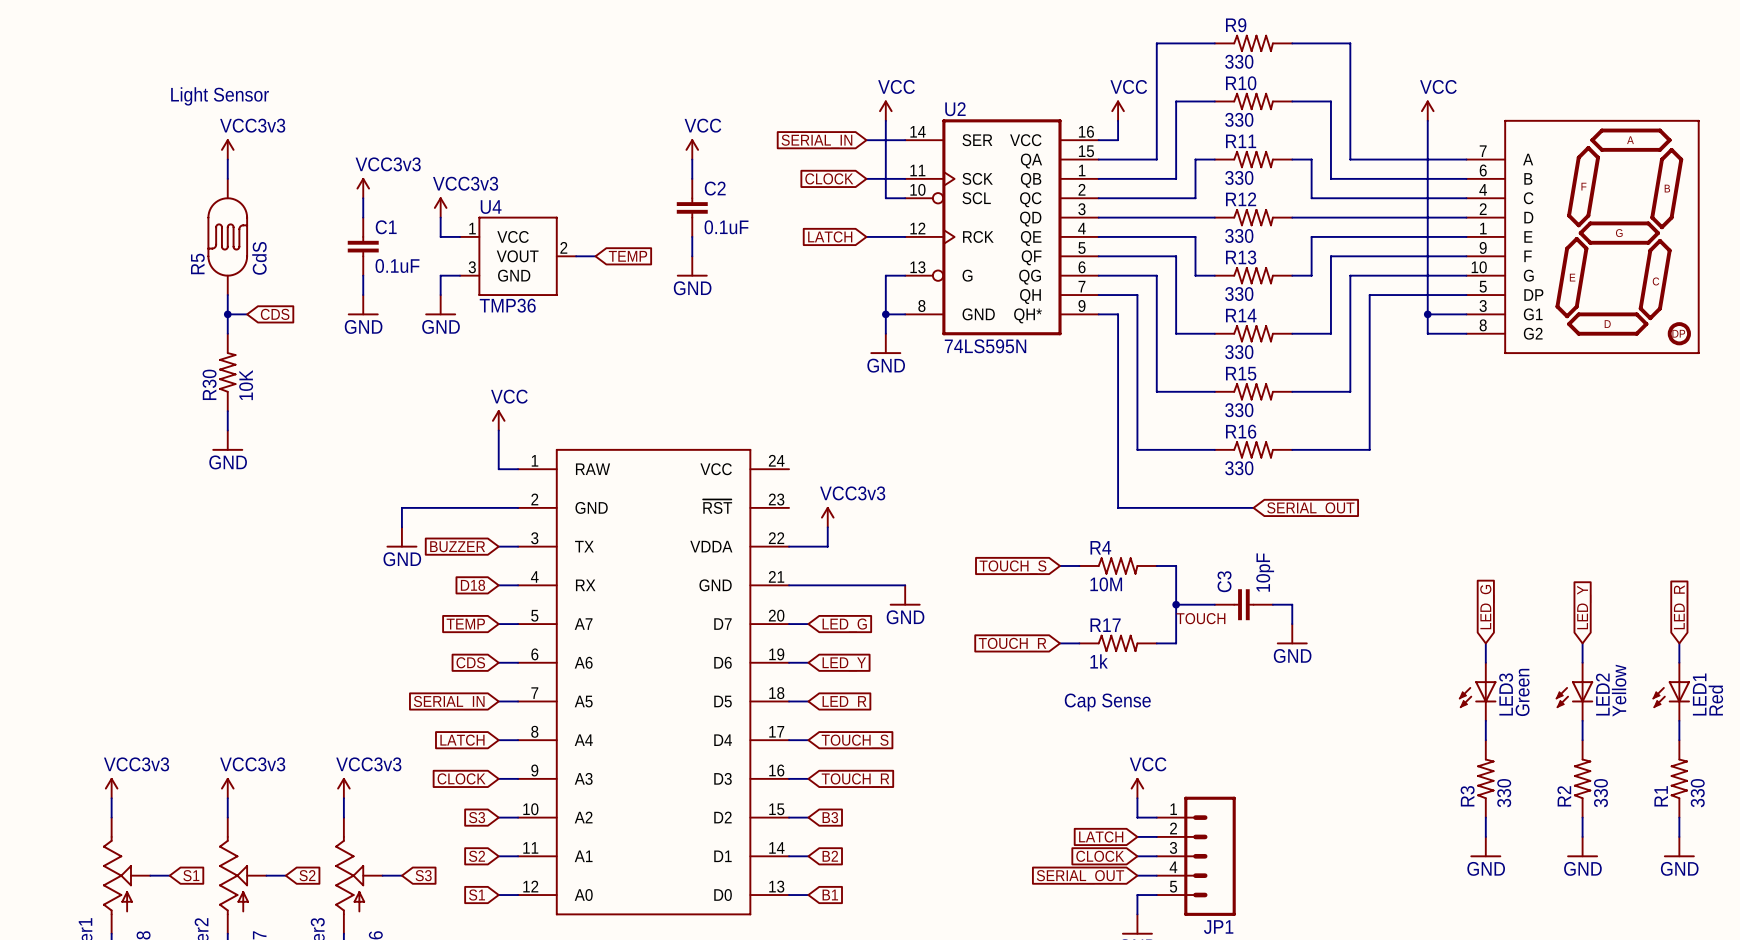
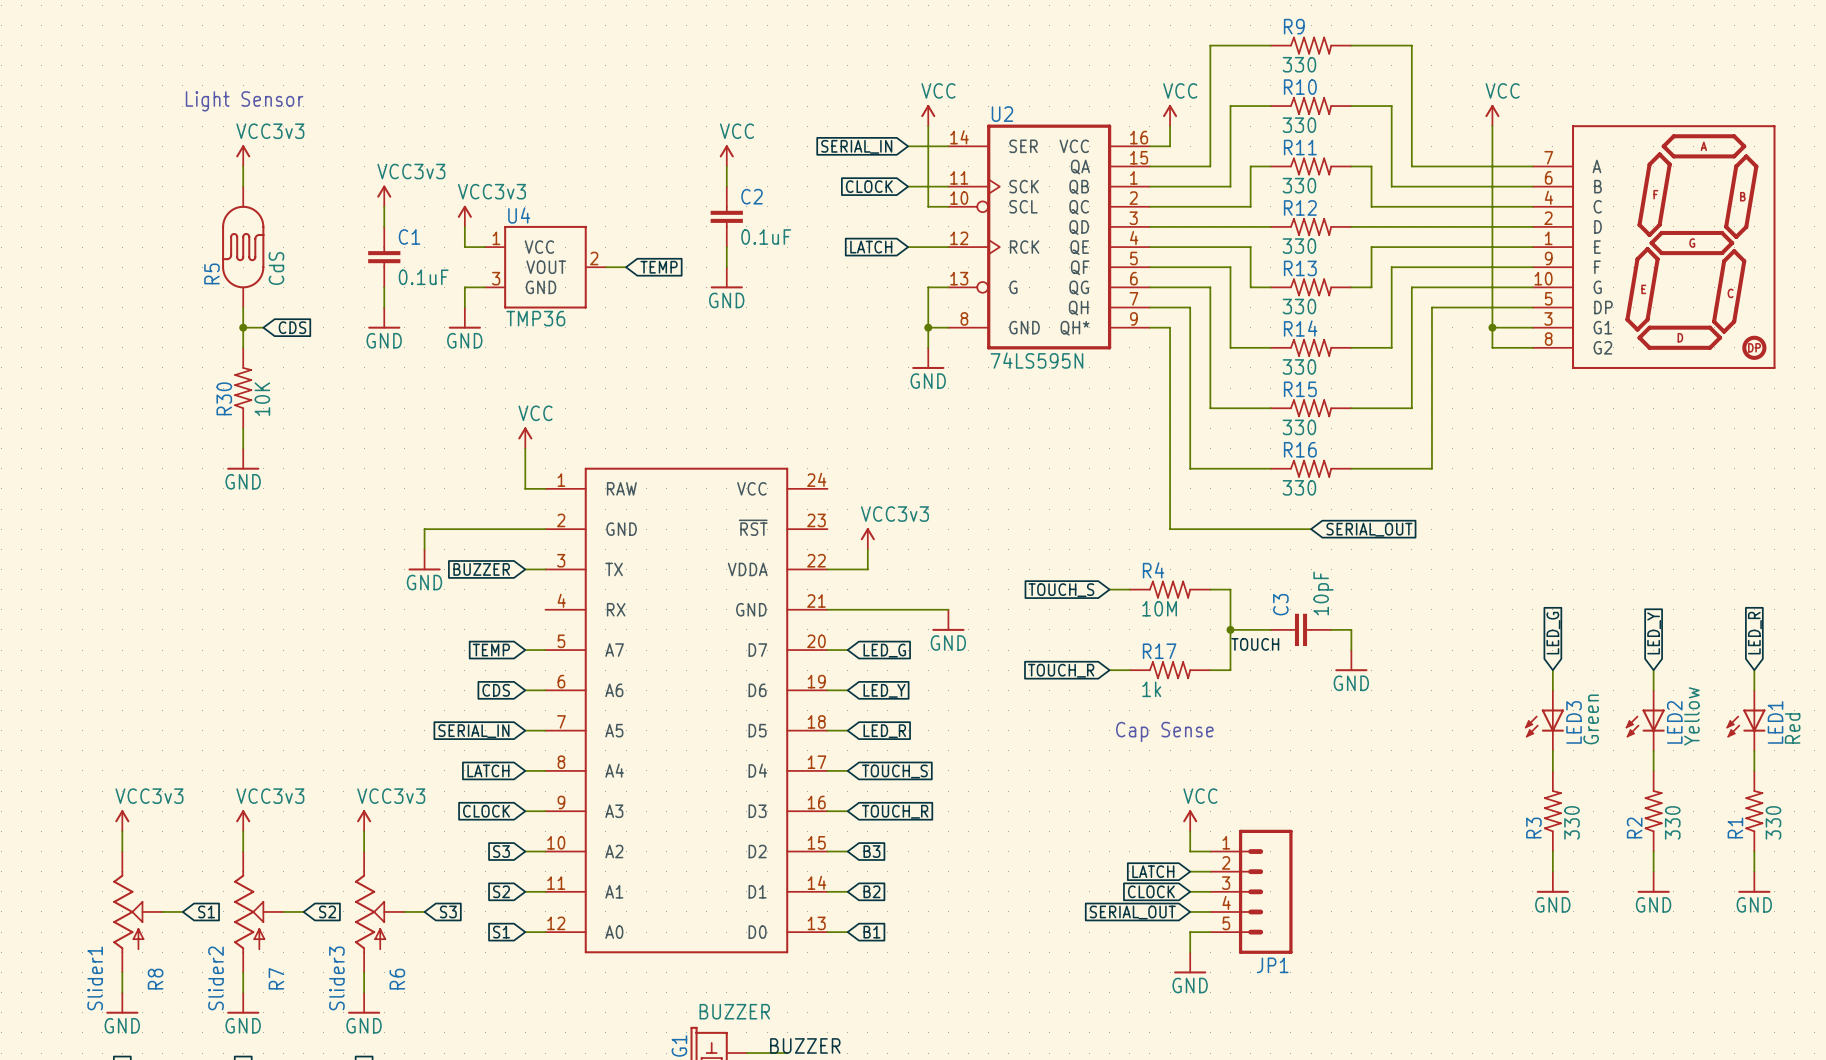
global label: D18 (472, 585) -> none
wire: (498, 585) (518, 585) -> none

